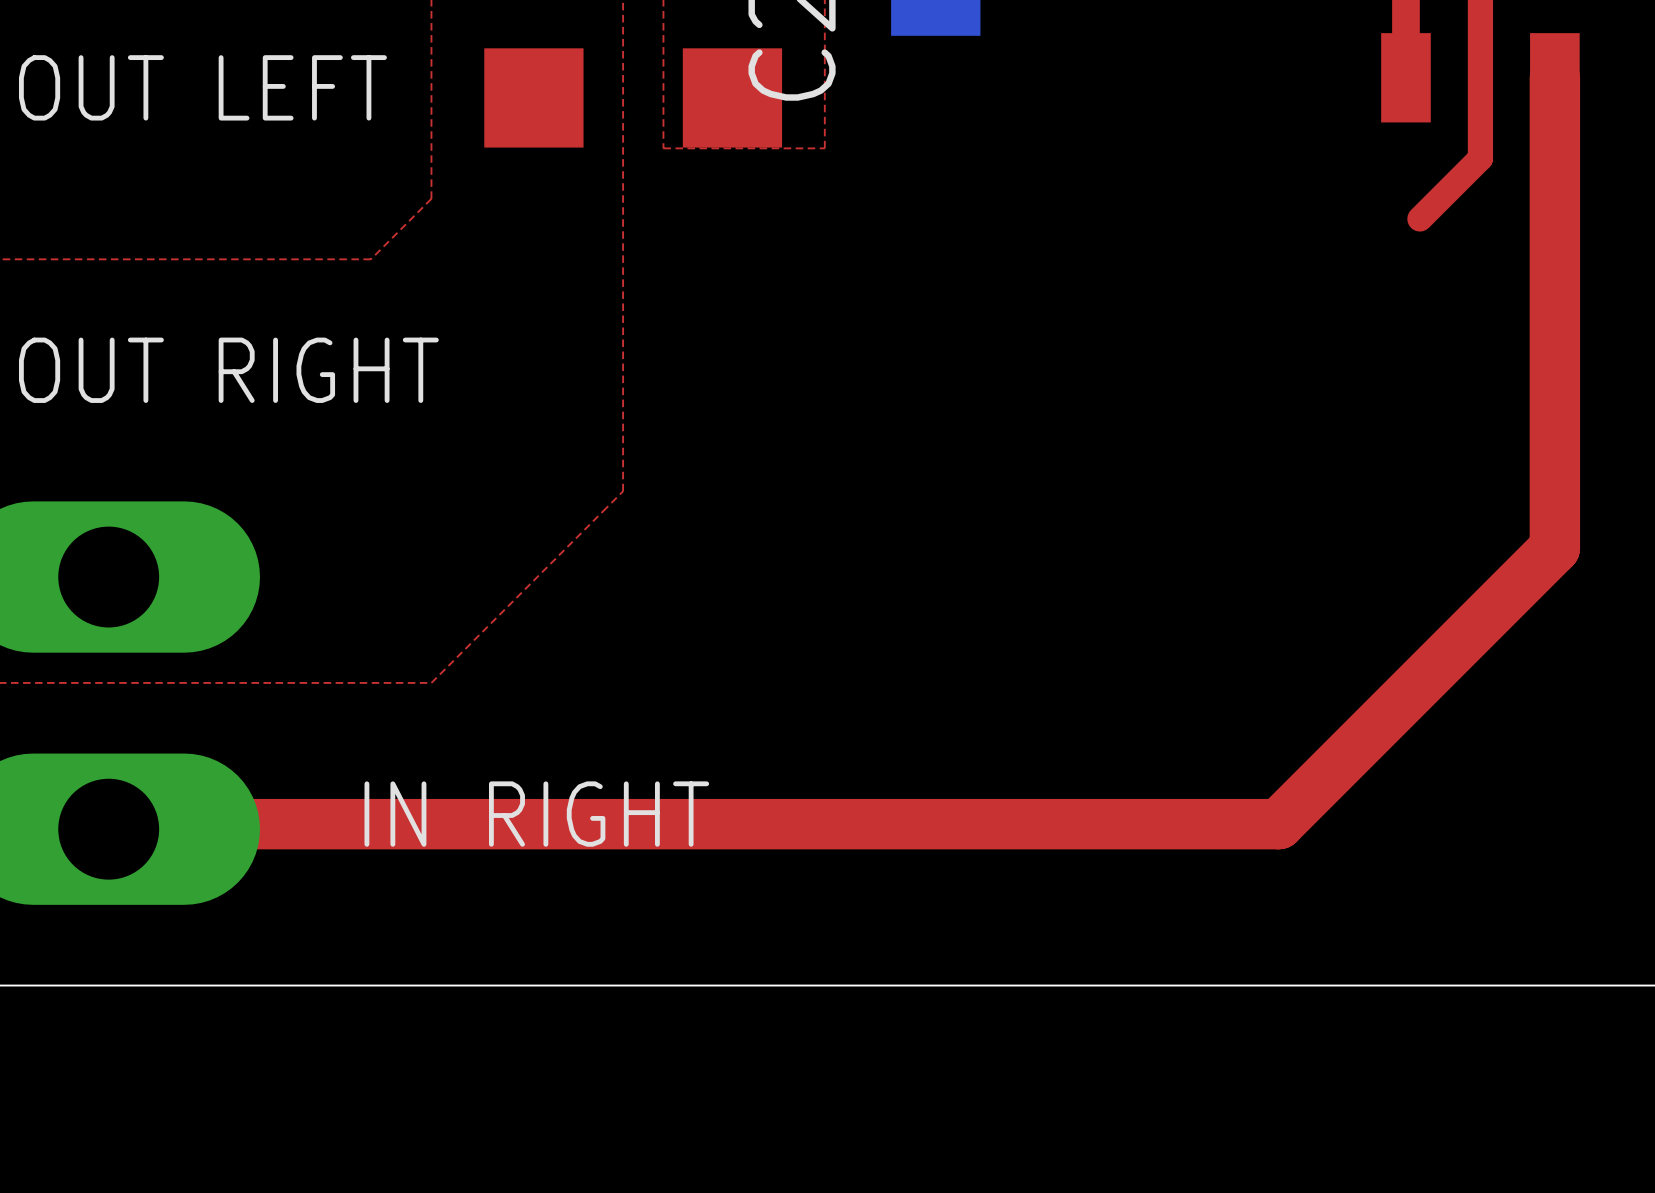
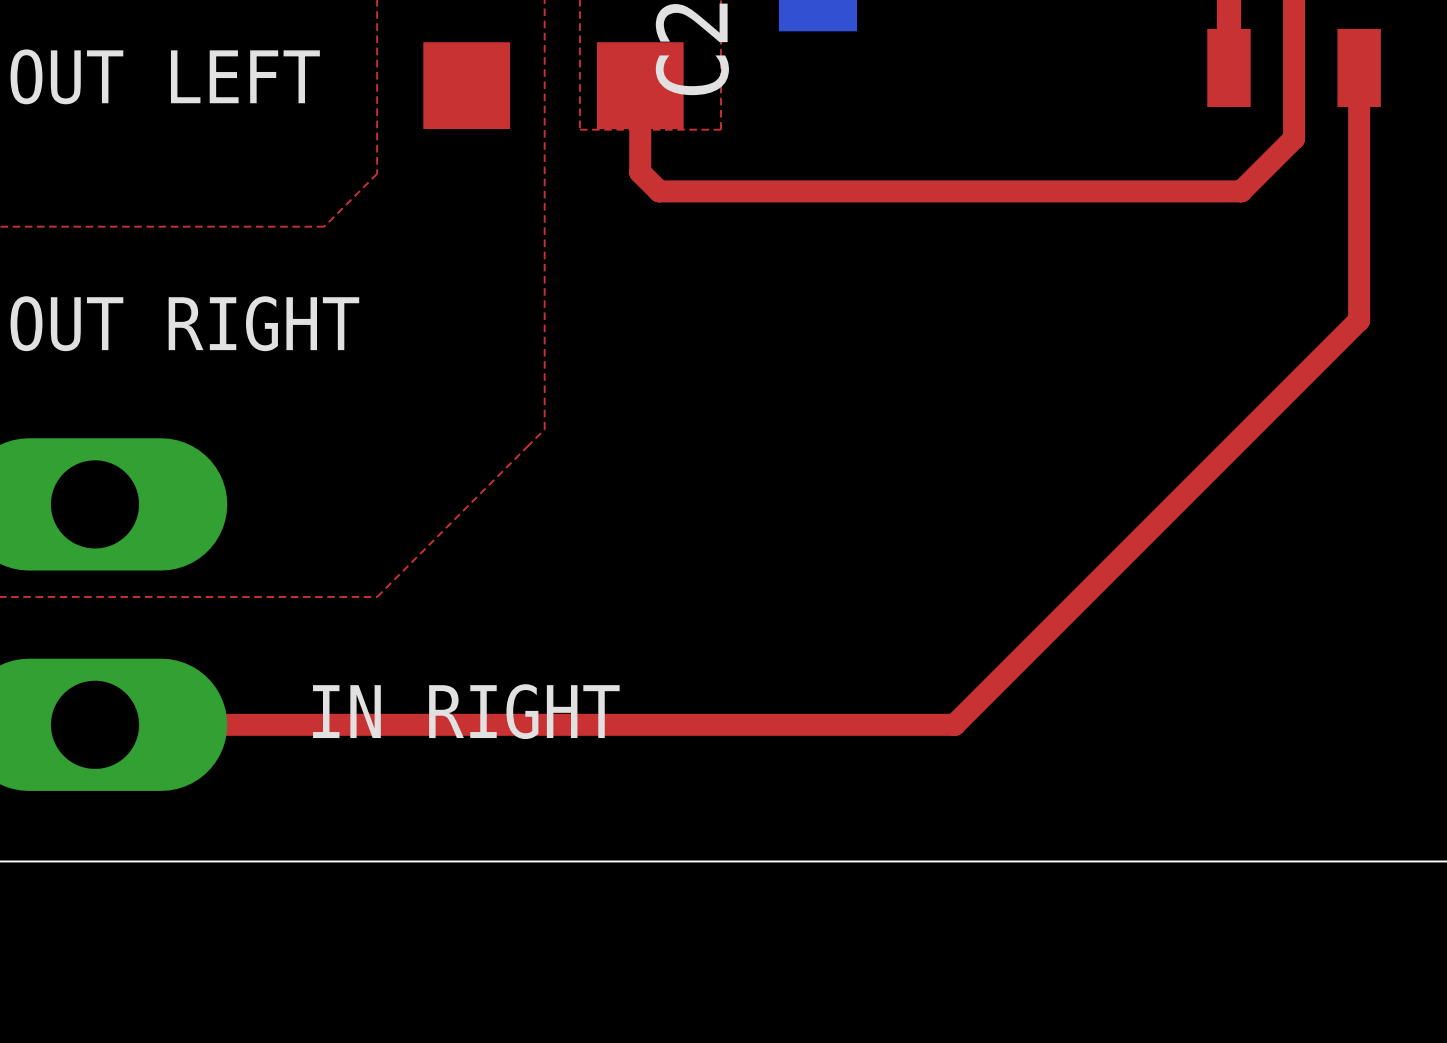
top track width: thick (1554, 77) (1554, 366) -> thin (1359, 67) (1359, 320)
top track: none -> (640, 85) (640, 172) (659, 191) (1241, 191)
top track: (1554, 366) (1554, 547) (1278, 824) (113, 824) (108, 829) -> (1359, 320) (954, 724) (95, 724)

